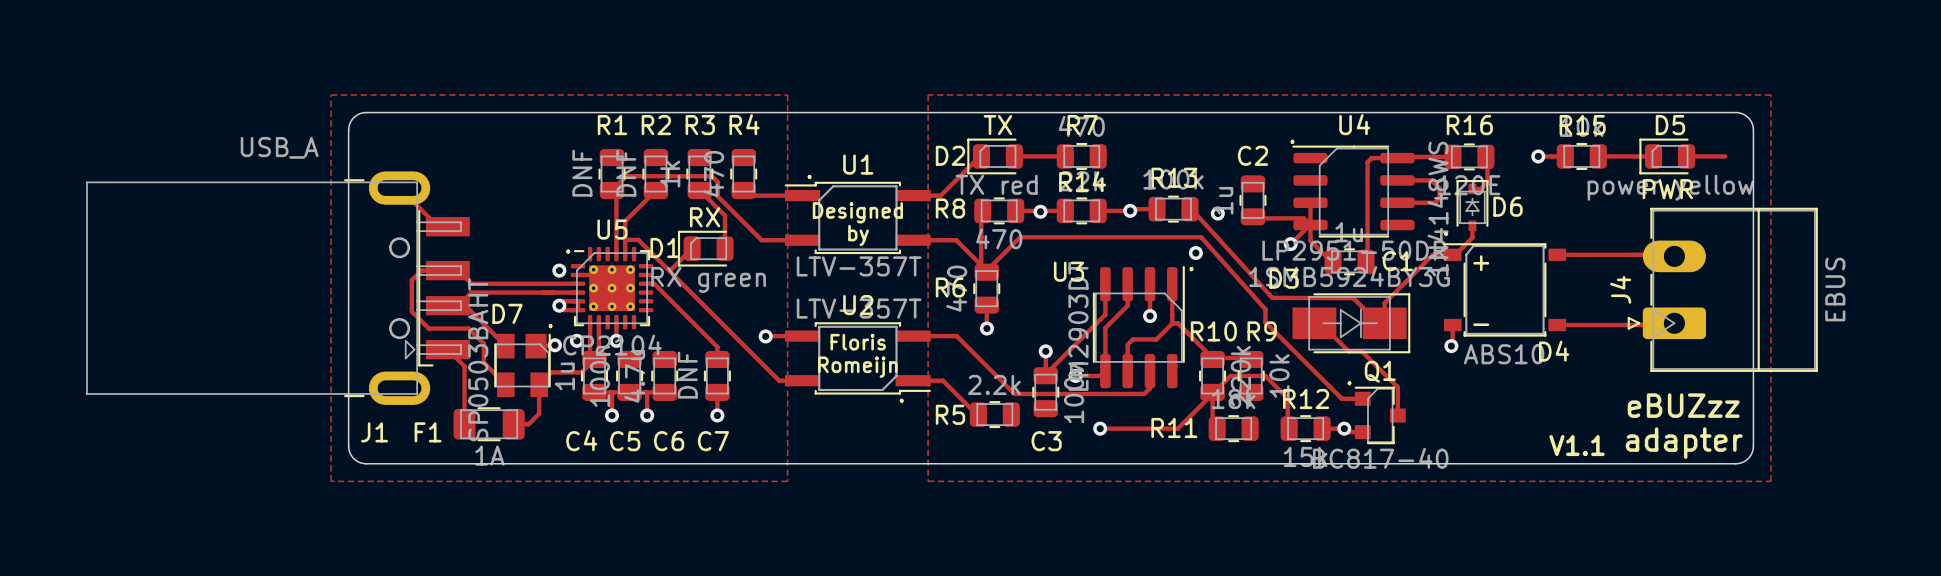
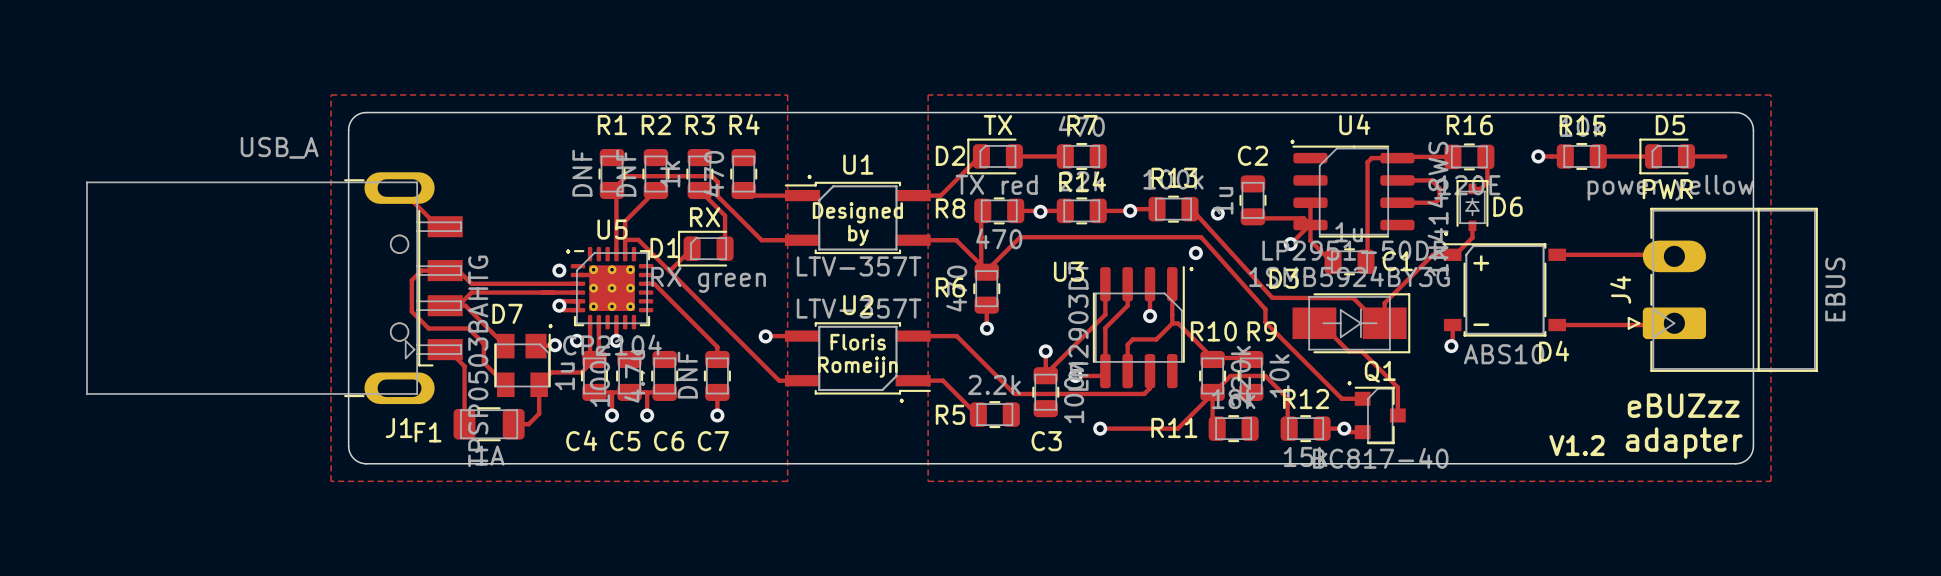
J1 footprint: [86, 171, 470, 405] -> [86, 172, 463, 405]
D7 value: SP0503BAHT (478, 359) -> TPSP0503BAHTG (478, 361)
text: V1.1 (1576, 445) -> V1.2 (1576, 445)

